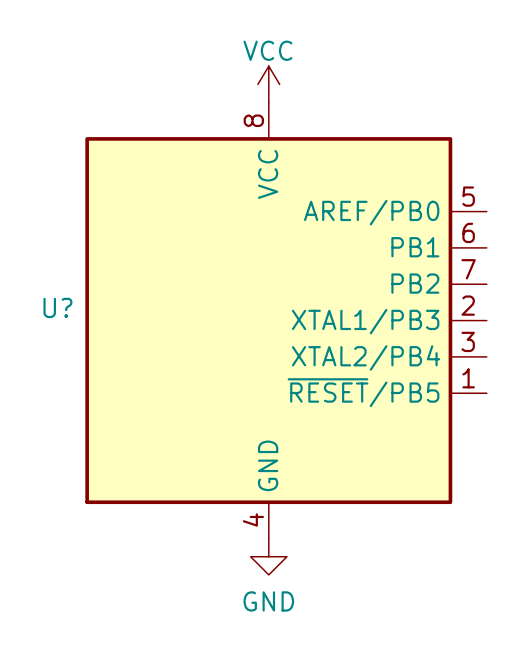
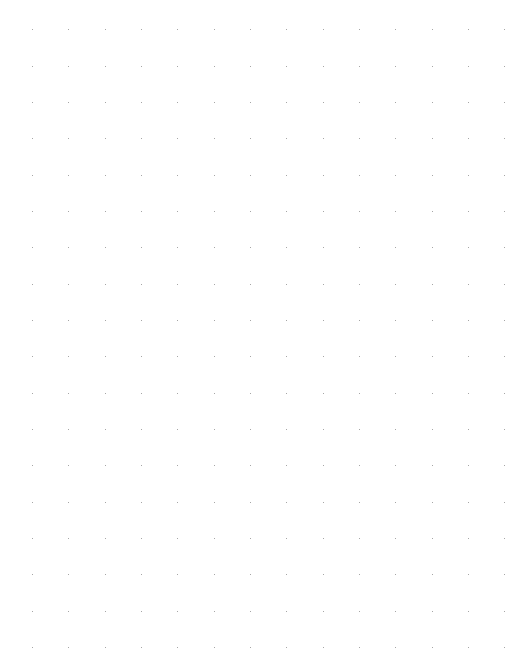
power symbol: VCC (268, 84) -> none
U?: (286, 320) -> none
power symbol: GND (268, 556) -> none

